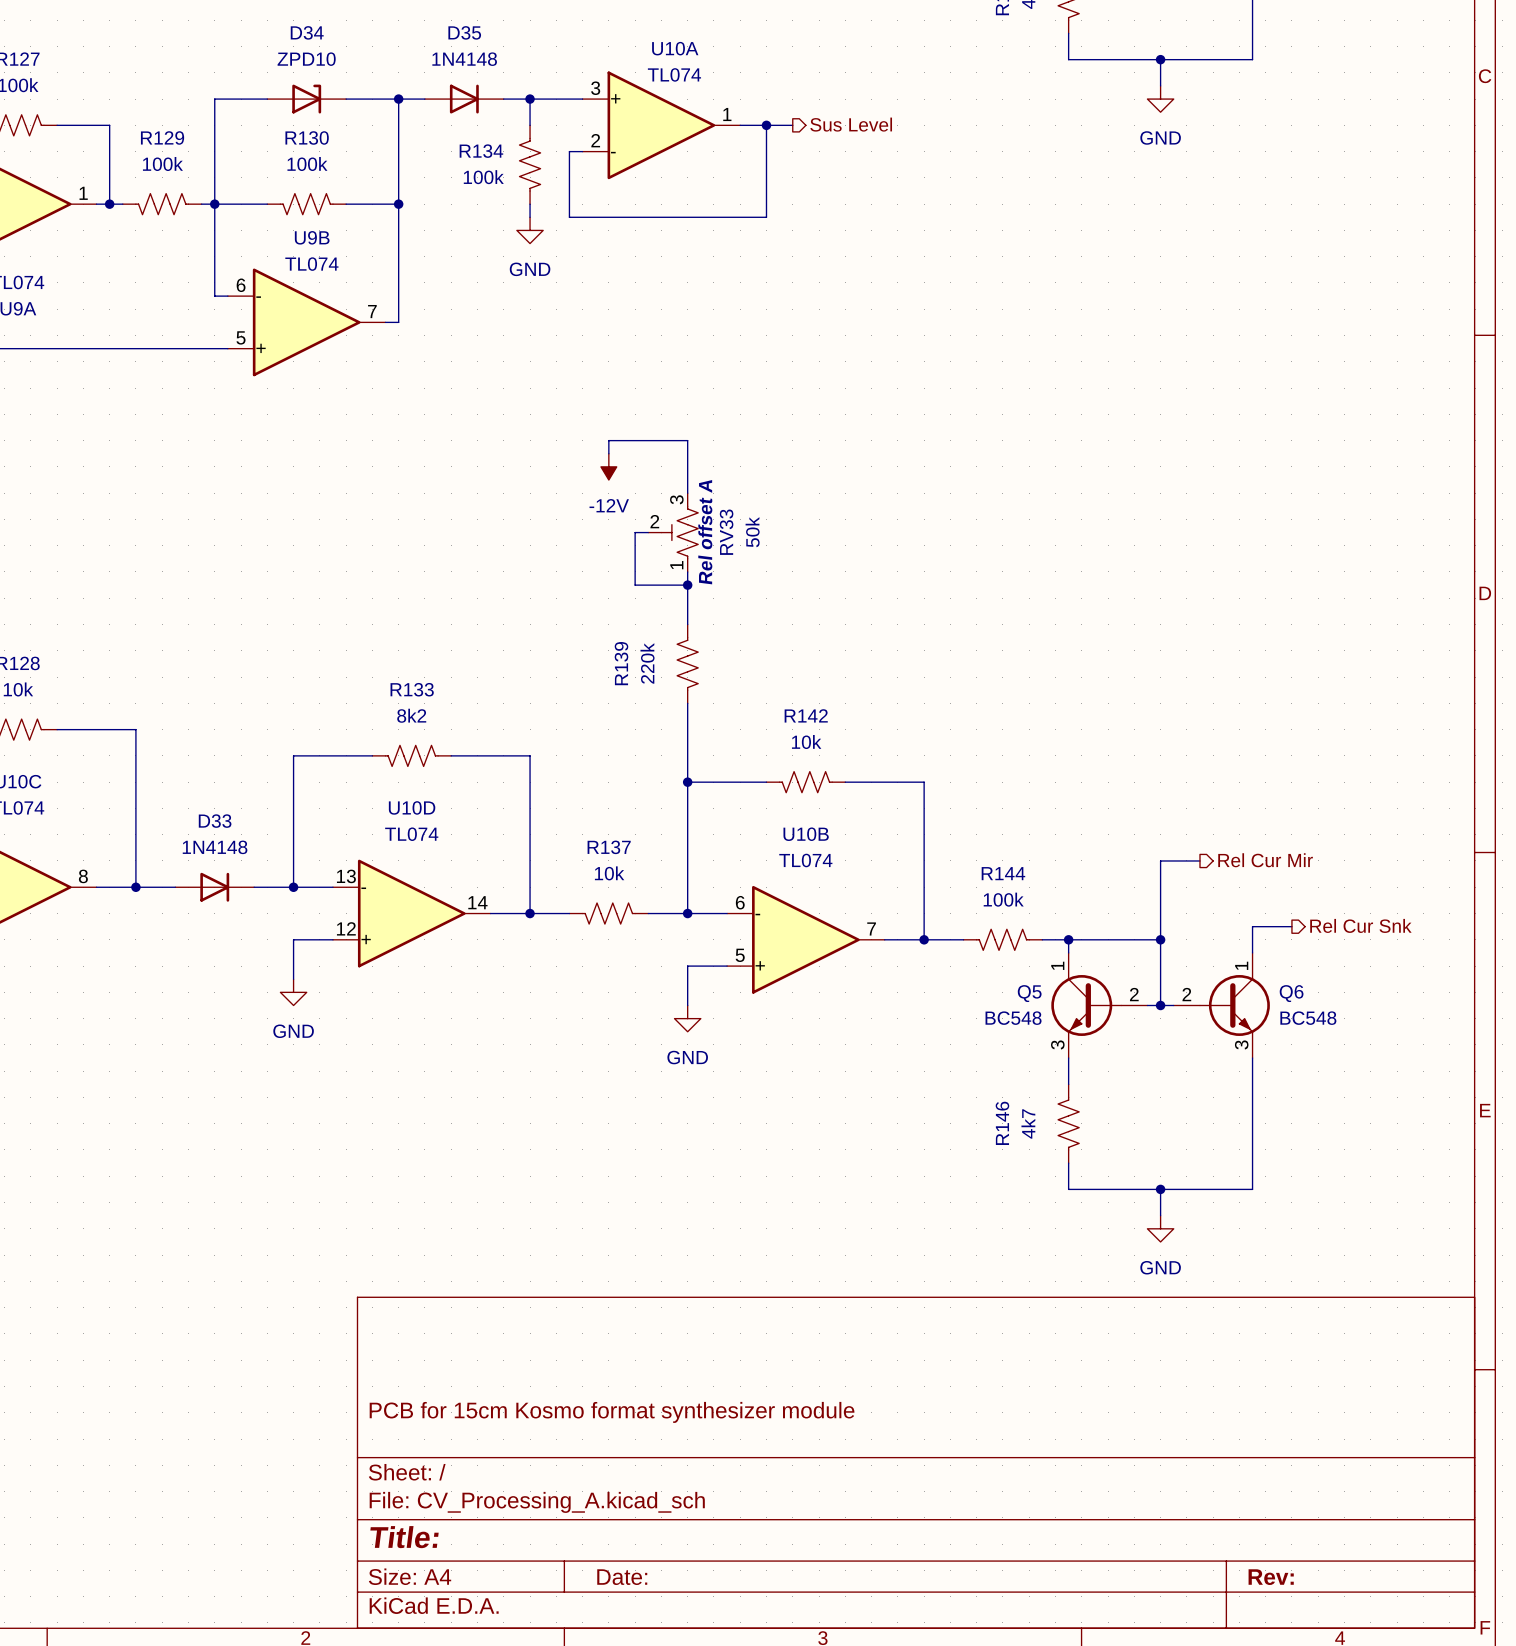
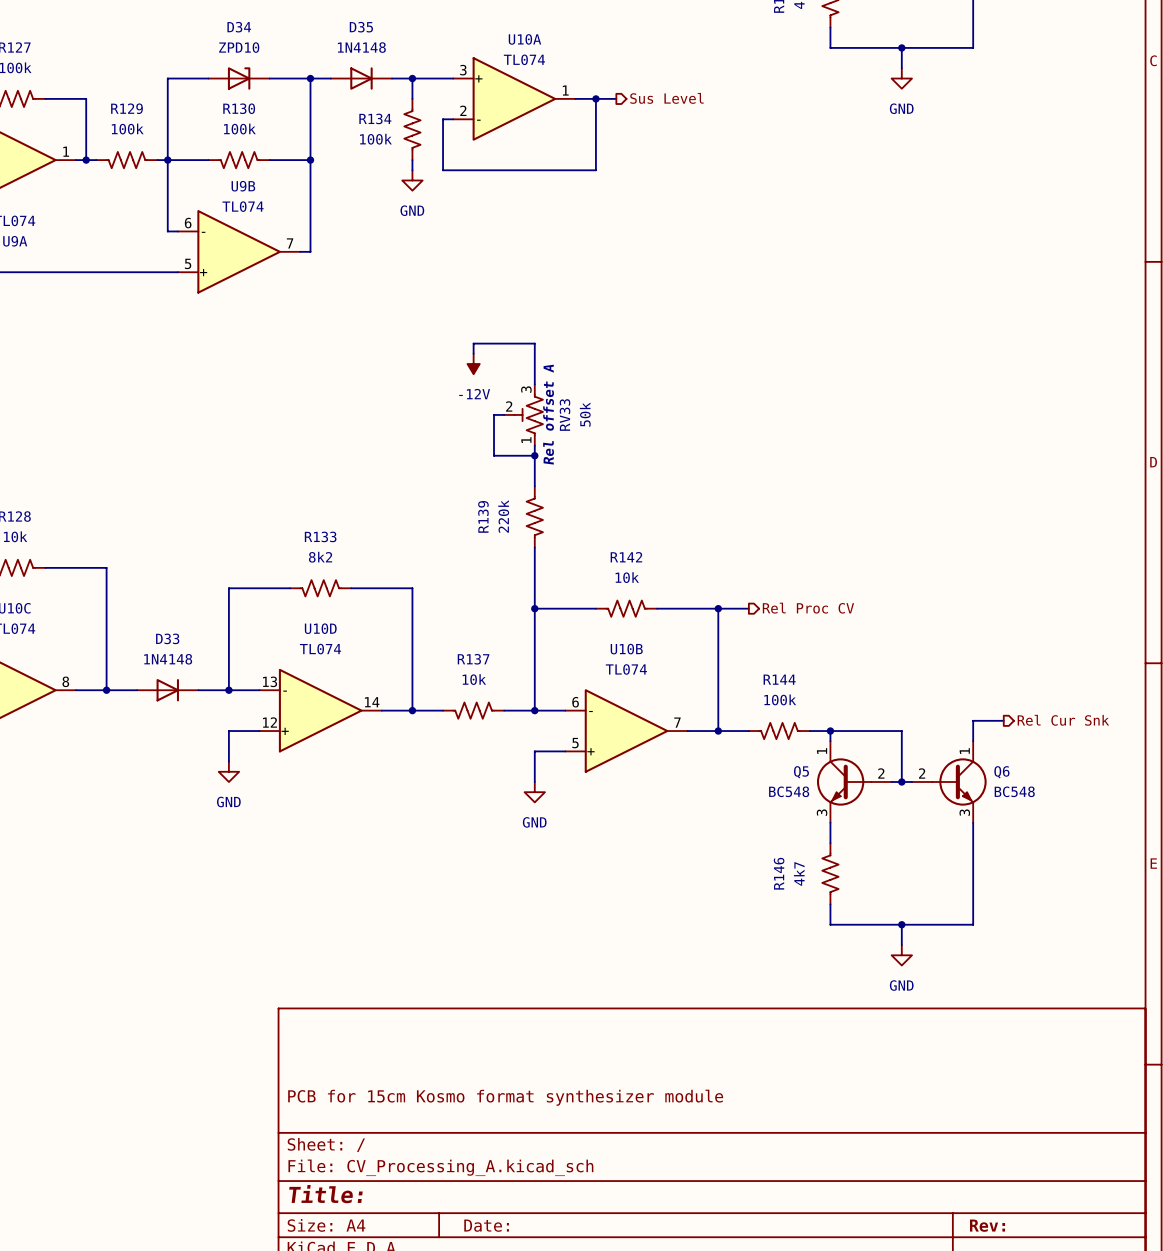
hierarchical label: none -> Rel Proc CV (808, 608)
wire: none -> (718, 608) (748, 608)
junction: none -> (718, 608)
wire: (1199, 860) (1160, 860) (1160, 939) -> none
hierarchical label: Rel Cur Mir (1265, 860) -> none
junction: (1160, 939) -> none

